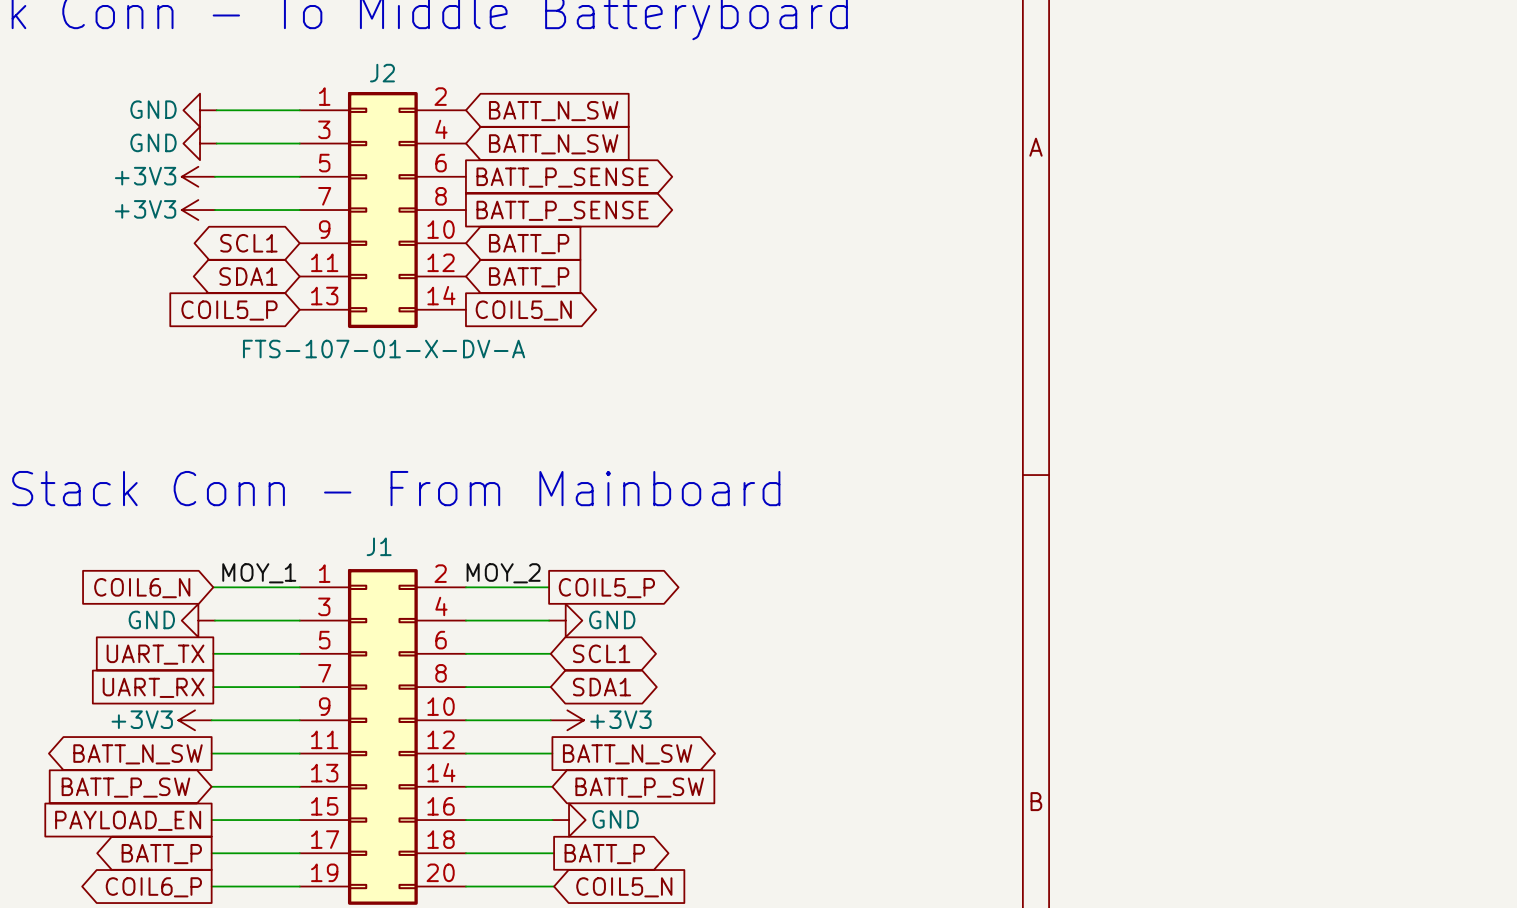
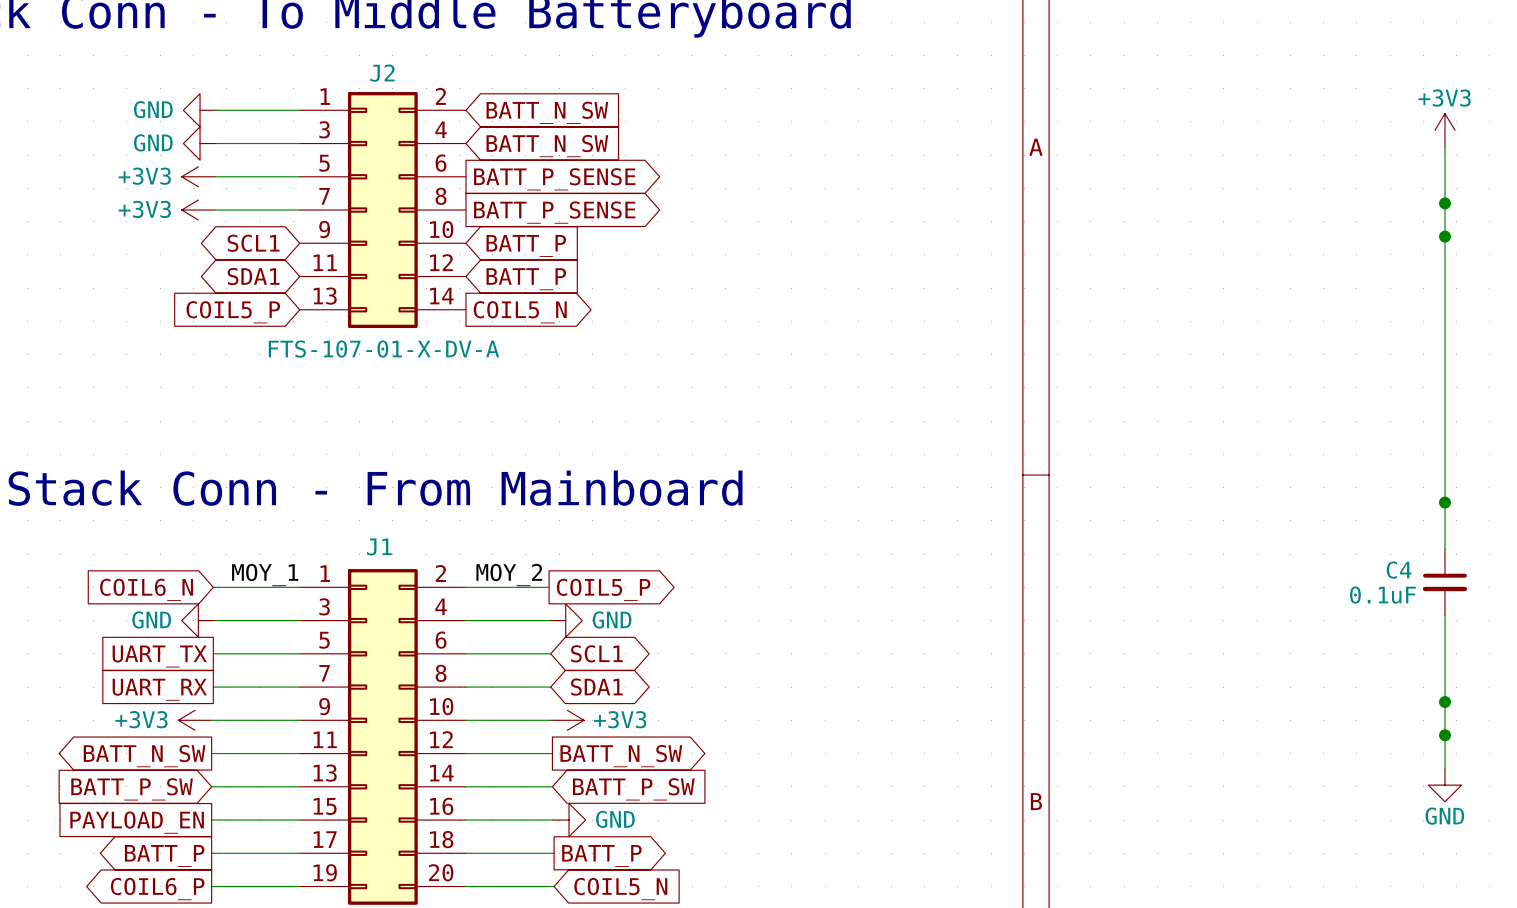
power symbol: none -> +3V3 (1444, 130)
wire: none -> (1444, 146) (1444, 549)
junction: none -> (1444, 203)
junction: none -> (1444, 236)
junction: none -> (1444, 502)
C4: none -> 0.1uF (1444, 582)
wire: none -> (1444, 615) (1444, 768)
junction: none -> (1444, 702)
junction: none -> (1444, 735)
power symbol: none -> GND (1444, 785)

